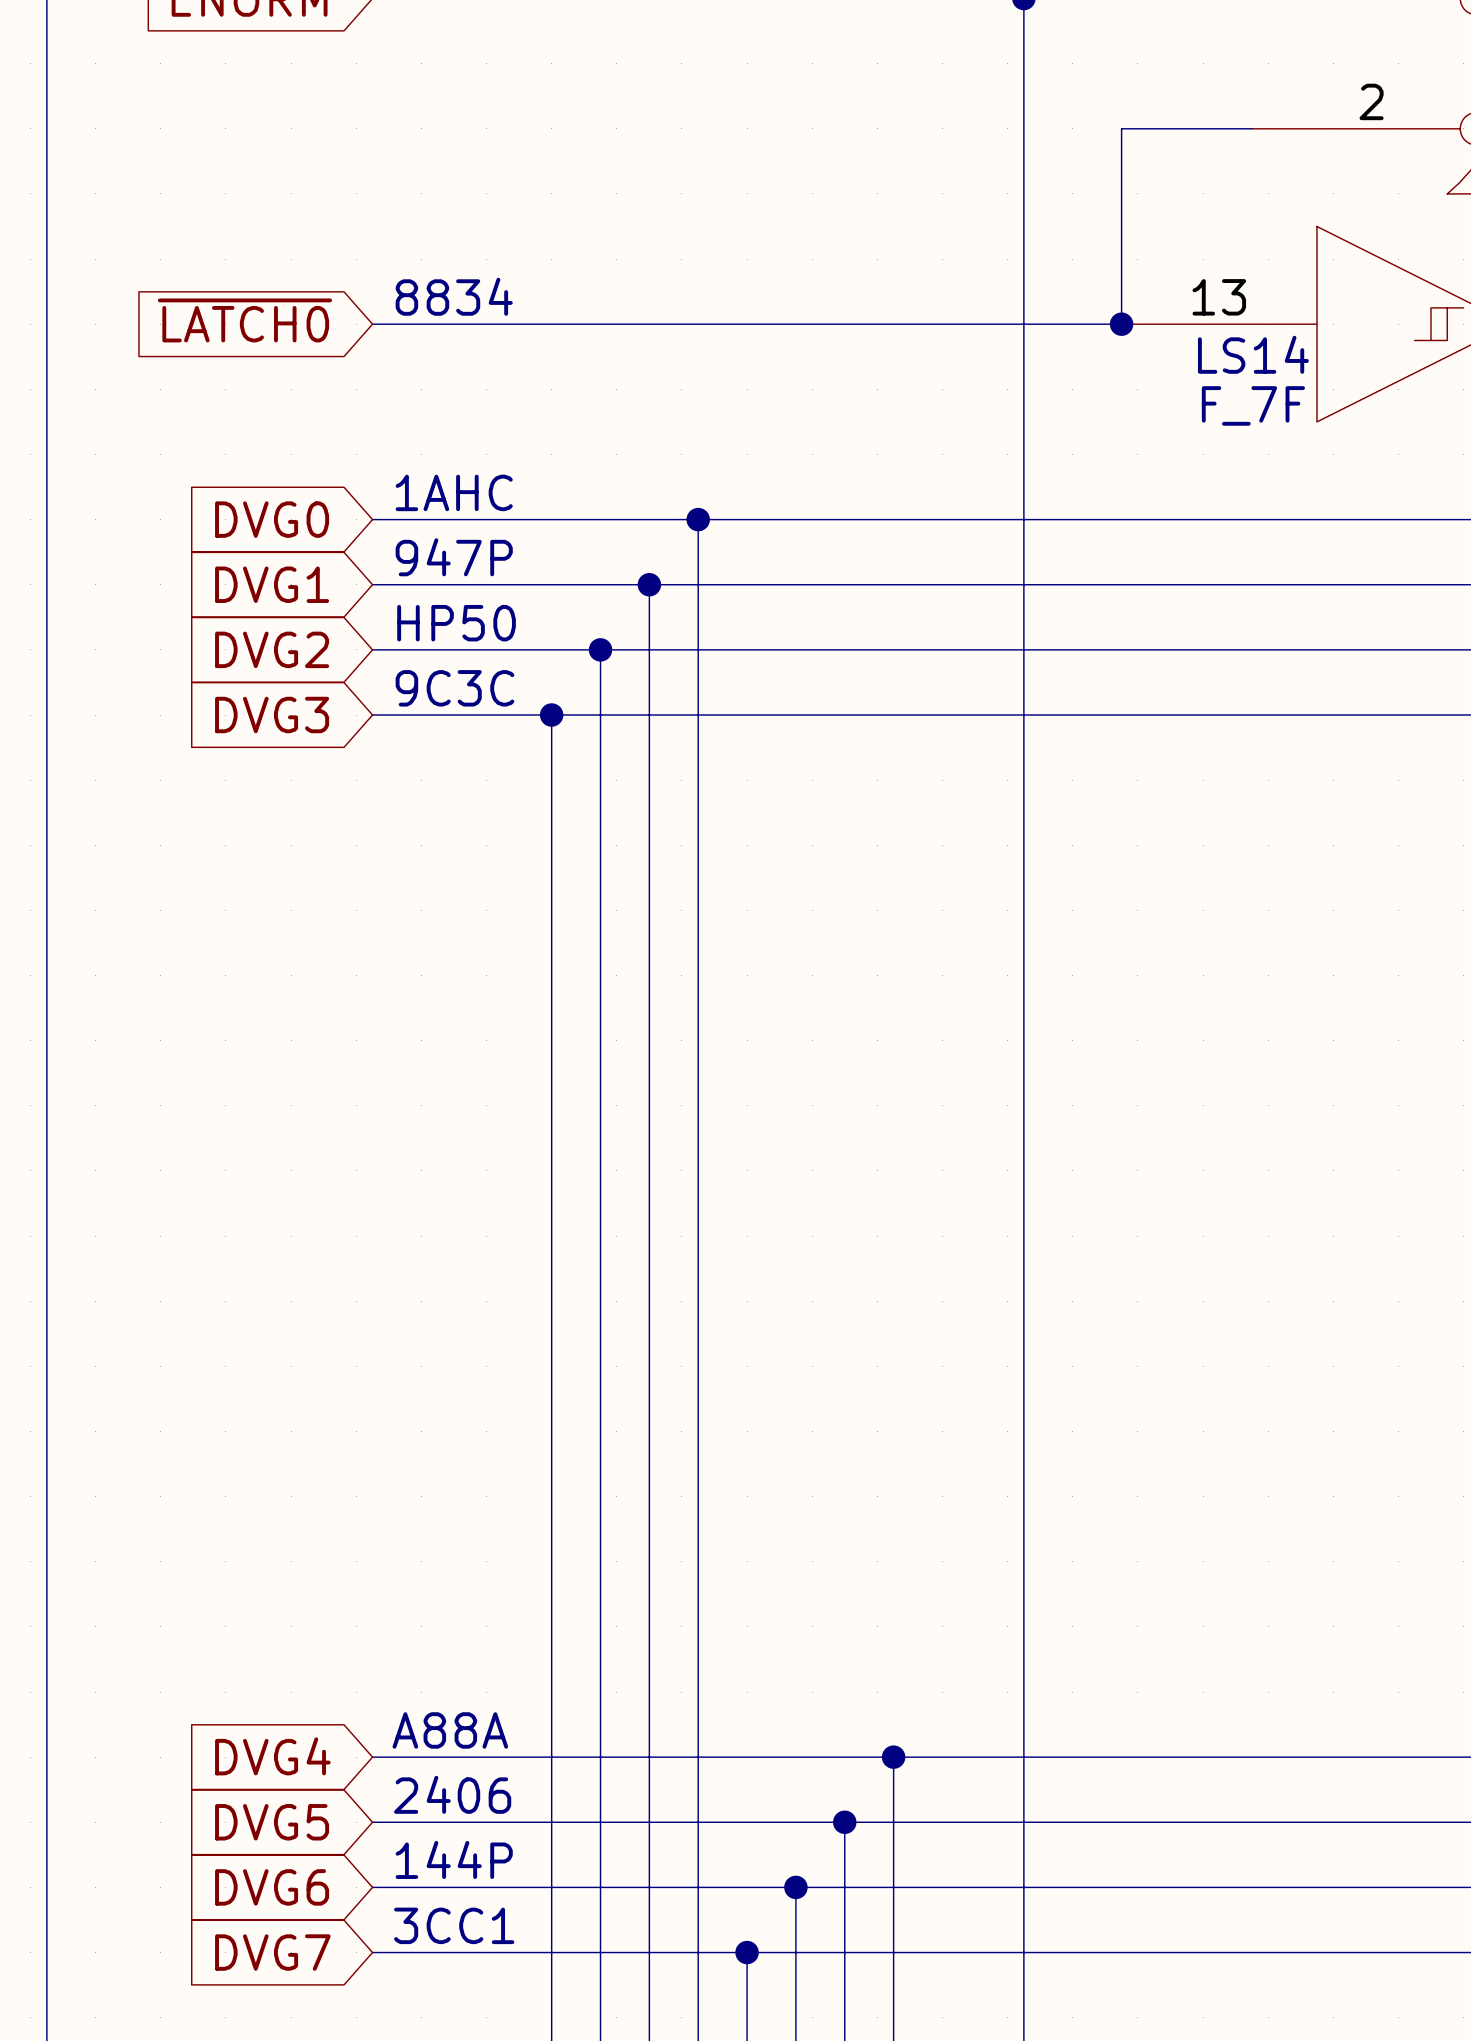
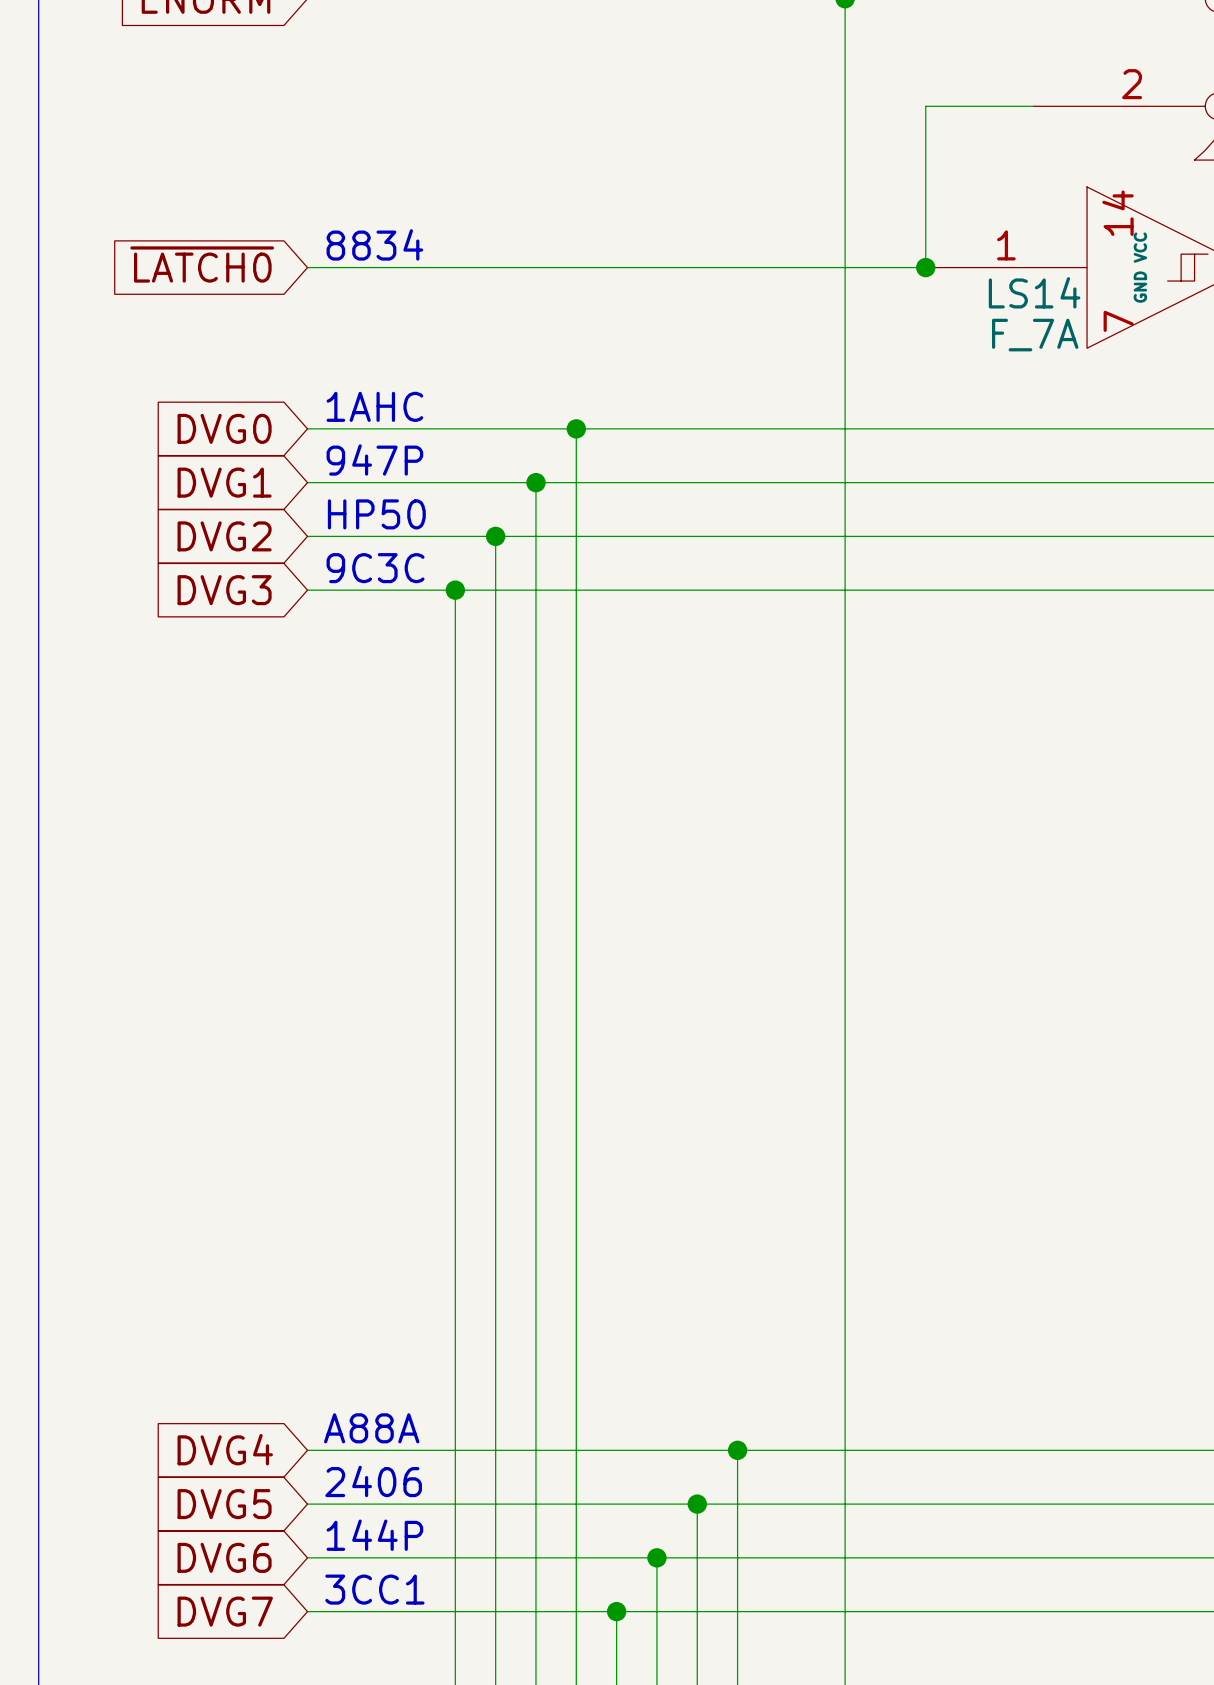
F_7F pin number: none -> 14 (1117, 213)
F_7F pin number: 13 (1219, 297) -> 1 (1006, 245)
F_7F pin name: none -> VCC (1140, 247)
F_7F pin name: none -> GND (1140, 287)
F_7F pin number: none -> 7 (1118, 321)
F_7F name: F_7F (1253, 405) -> F_7A (1035, 335)

